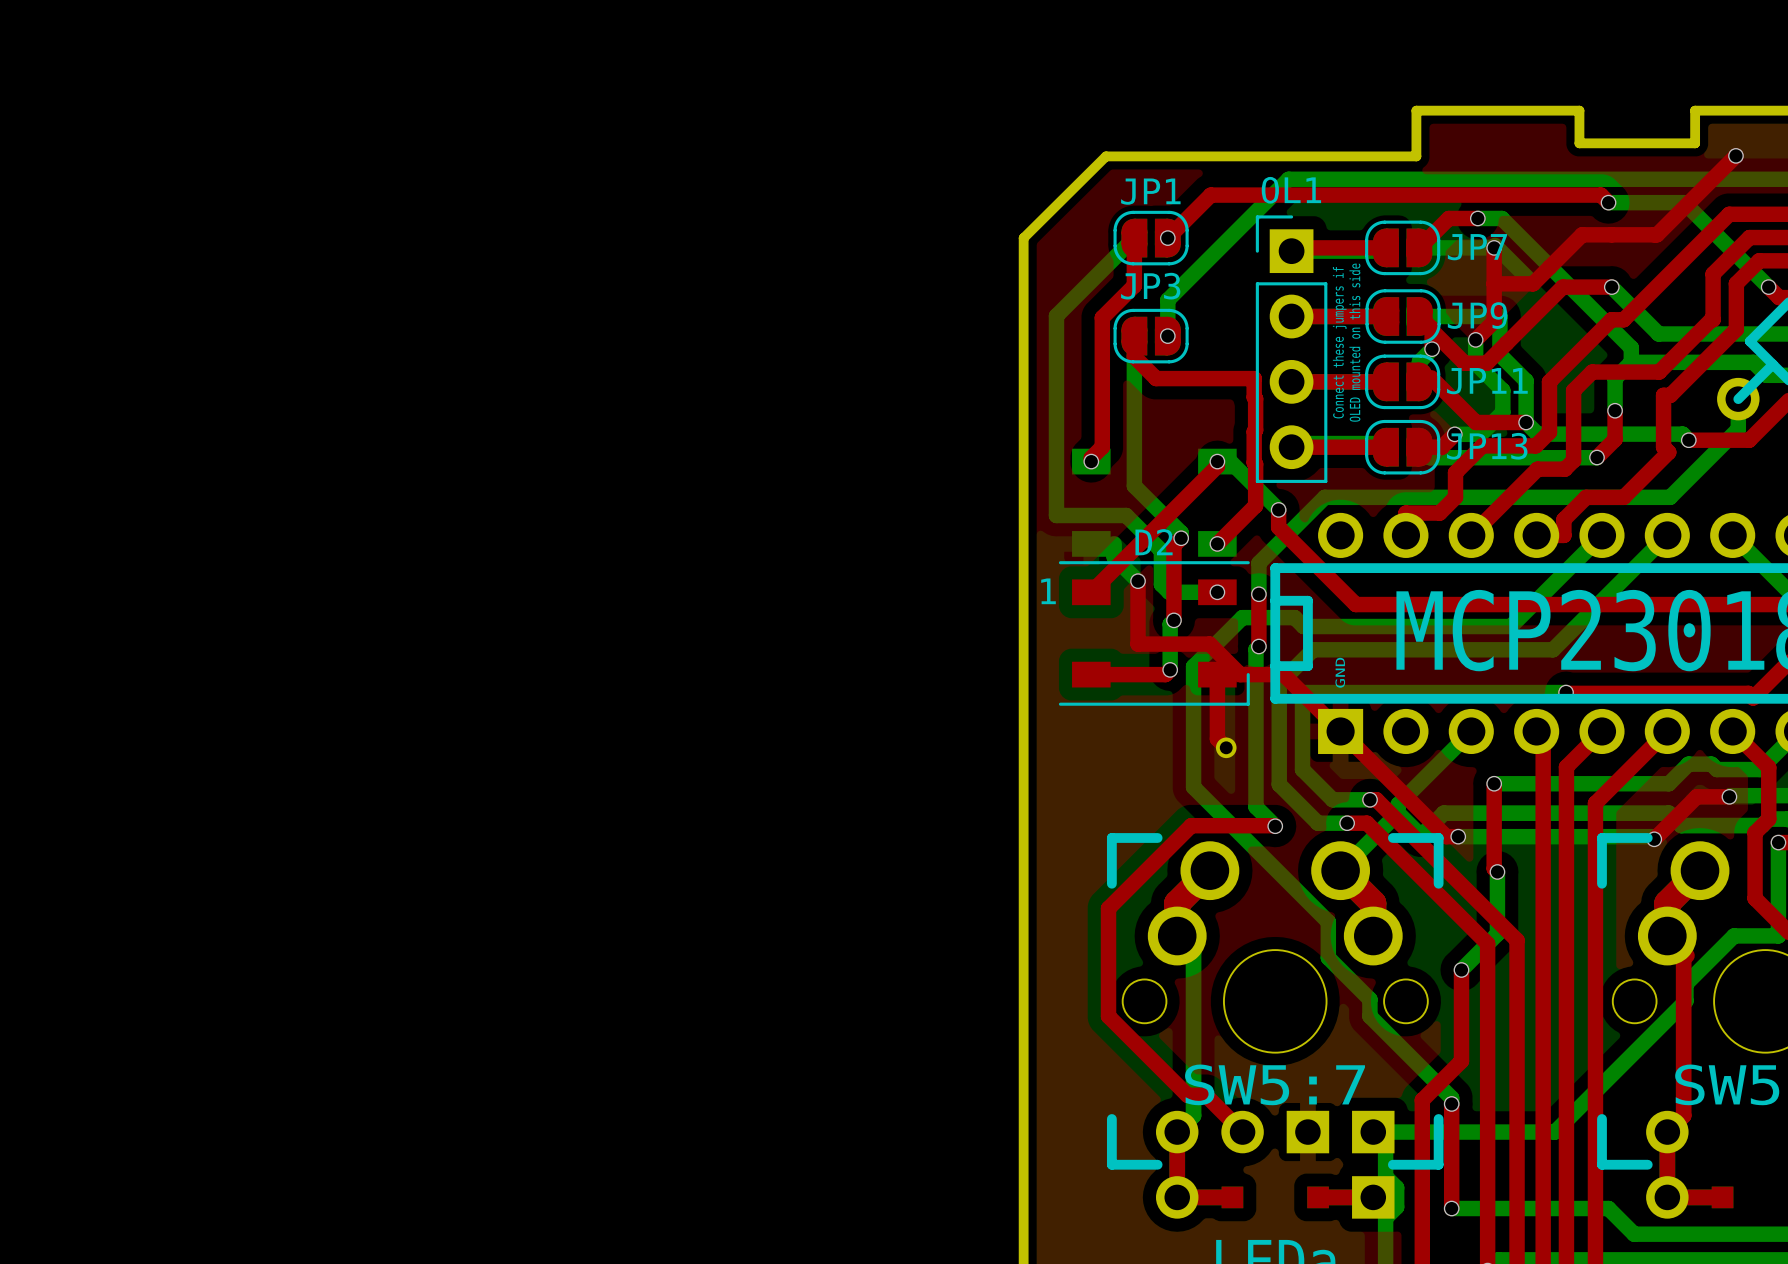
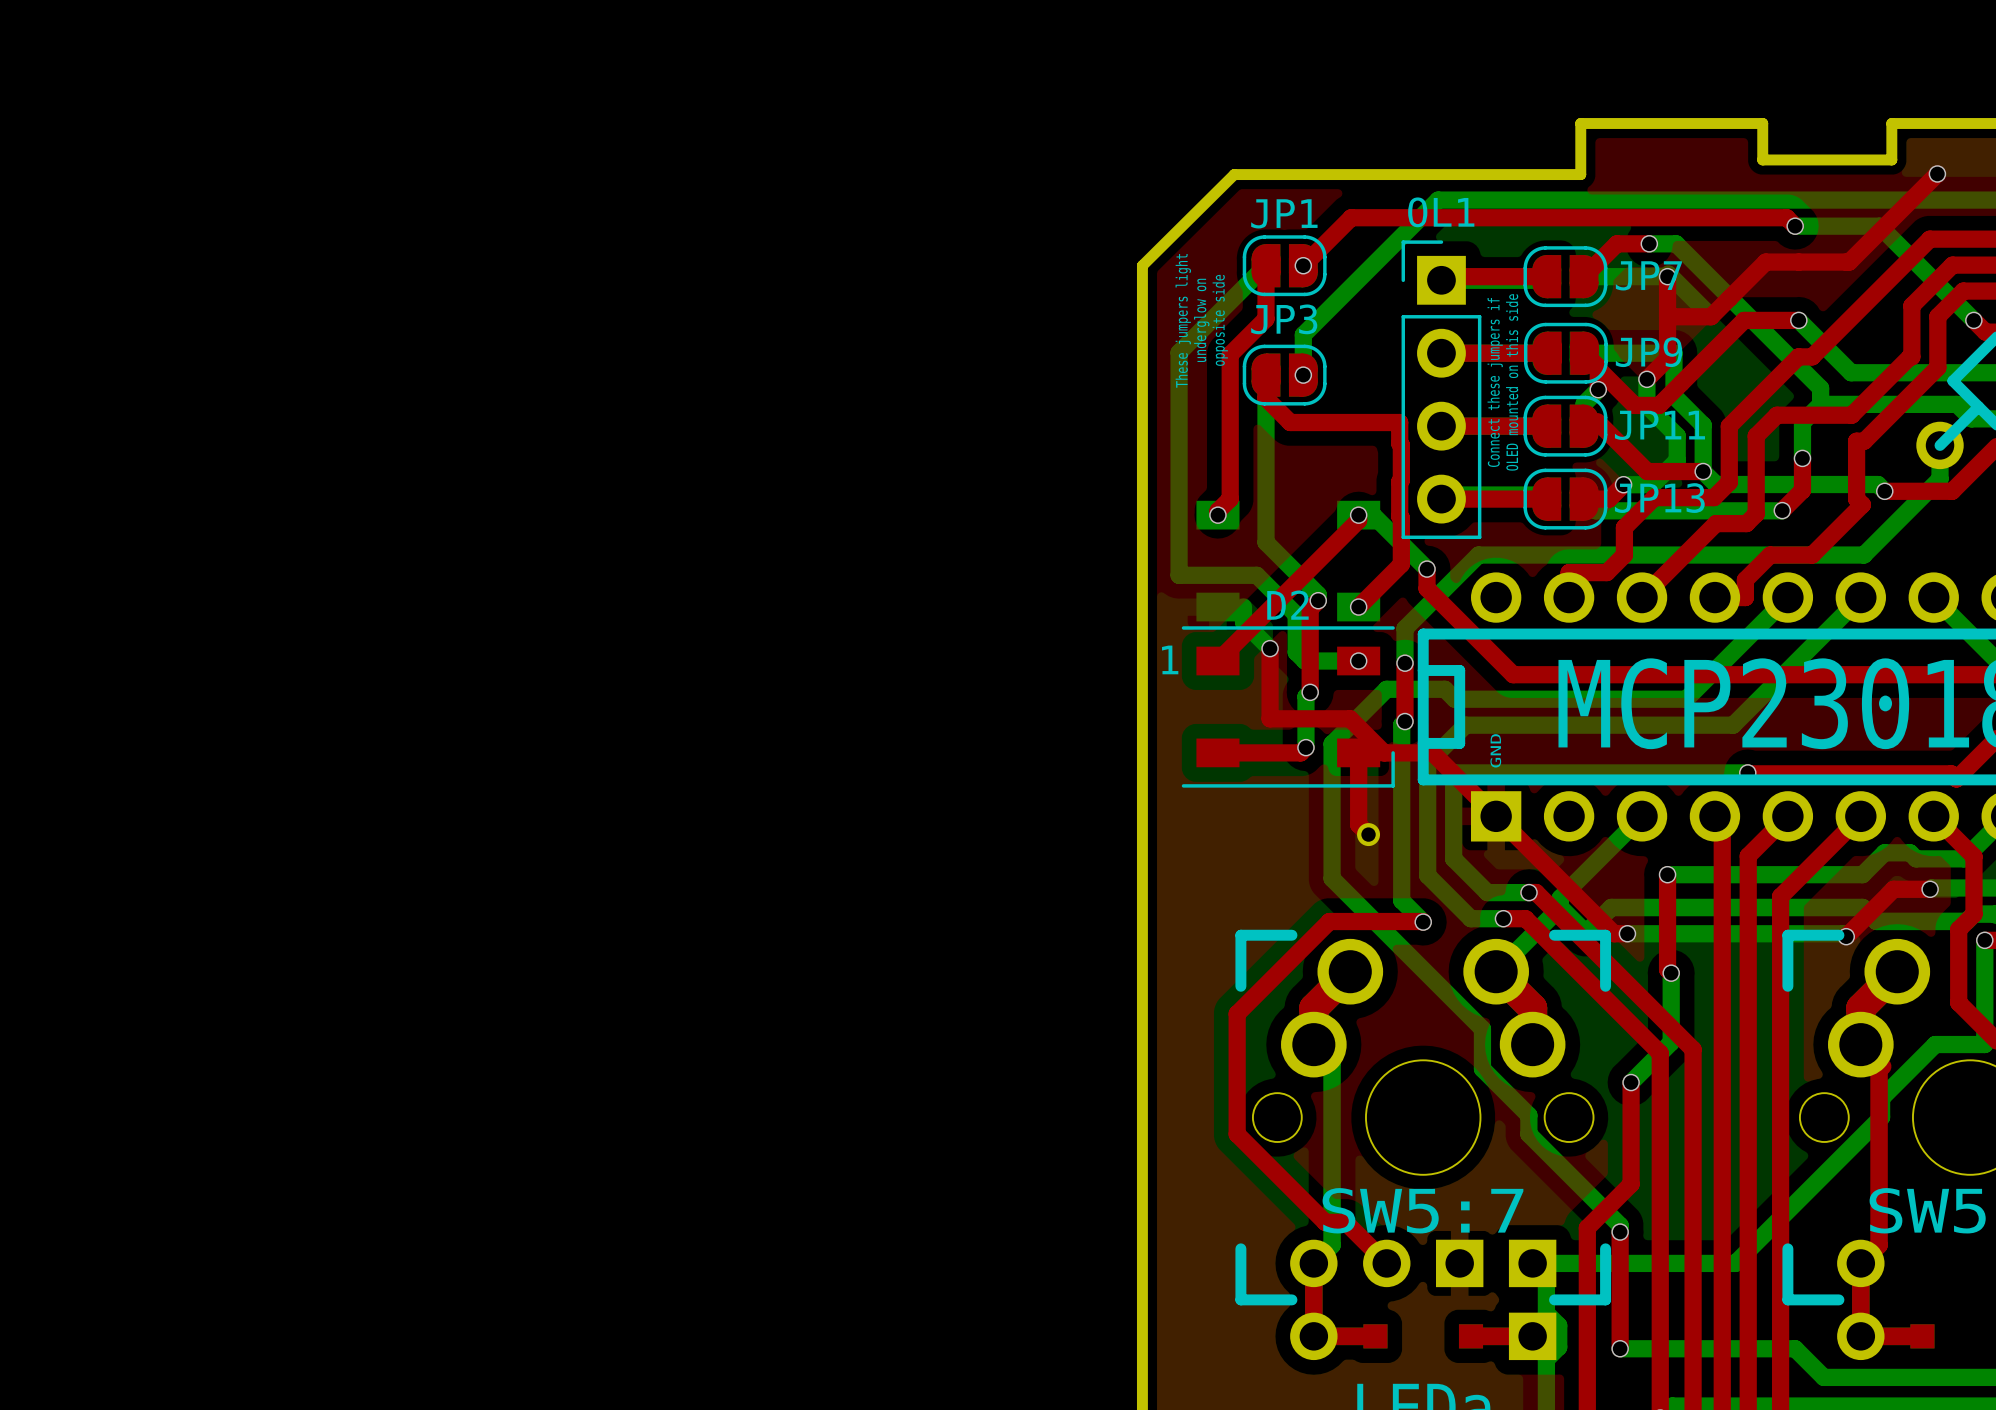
text: none -> These jumpers light (1183, 320)
text: none -> underglow on (1201, 320)
text: none -> opposite side (1220, 320)

